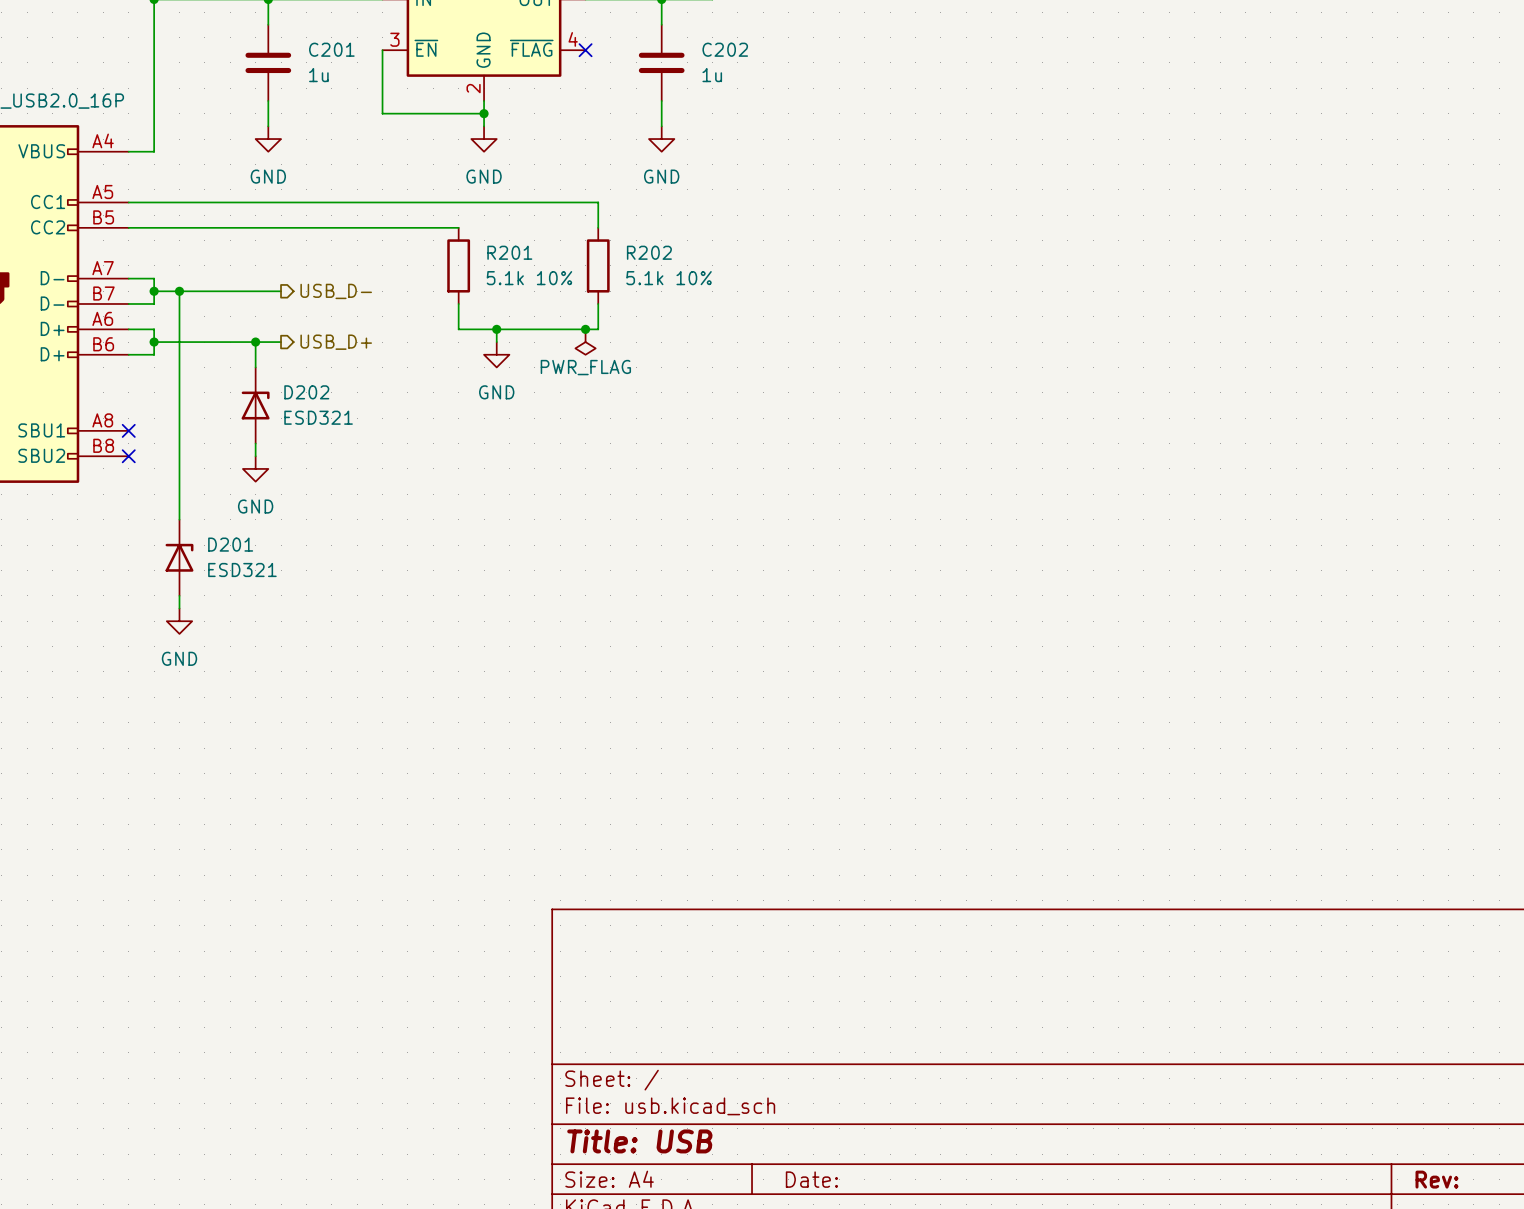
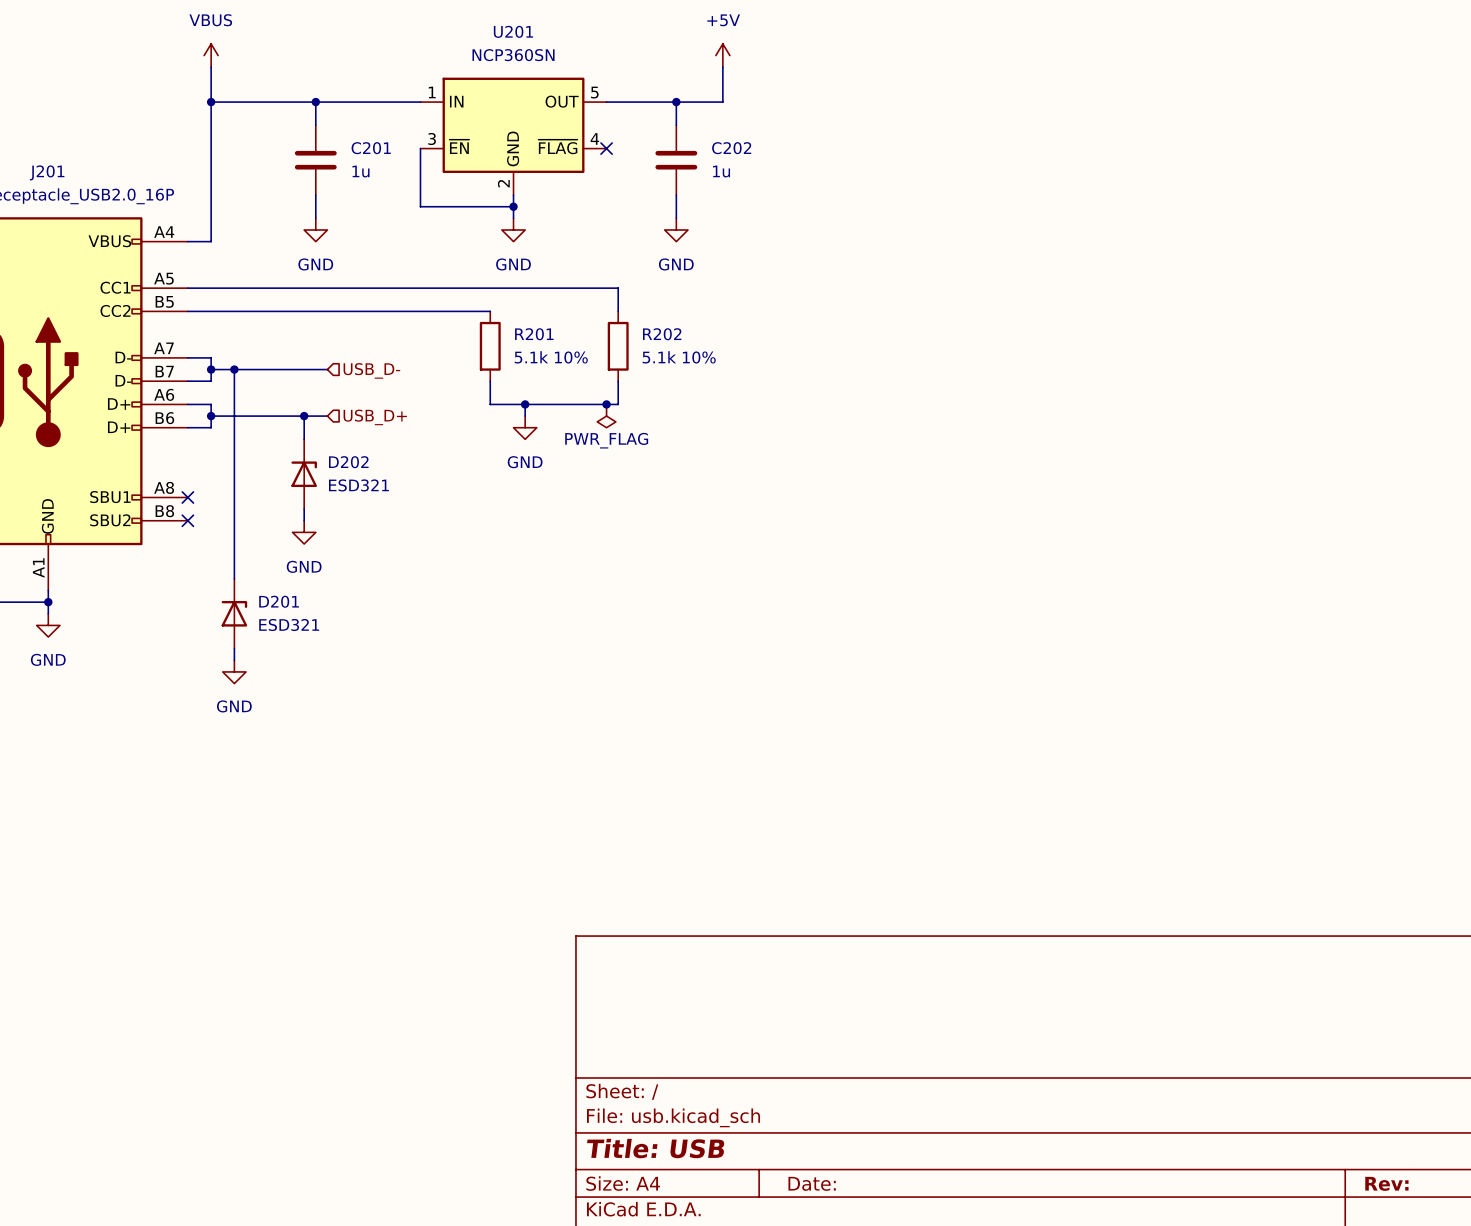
hierarchical label shape: output (336, 291) -> input (371, 370)
hierarchical label shape: output (336, 342) -> input (375, 417)

